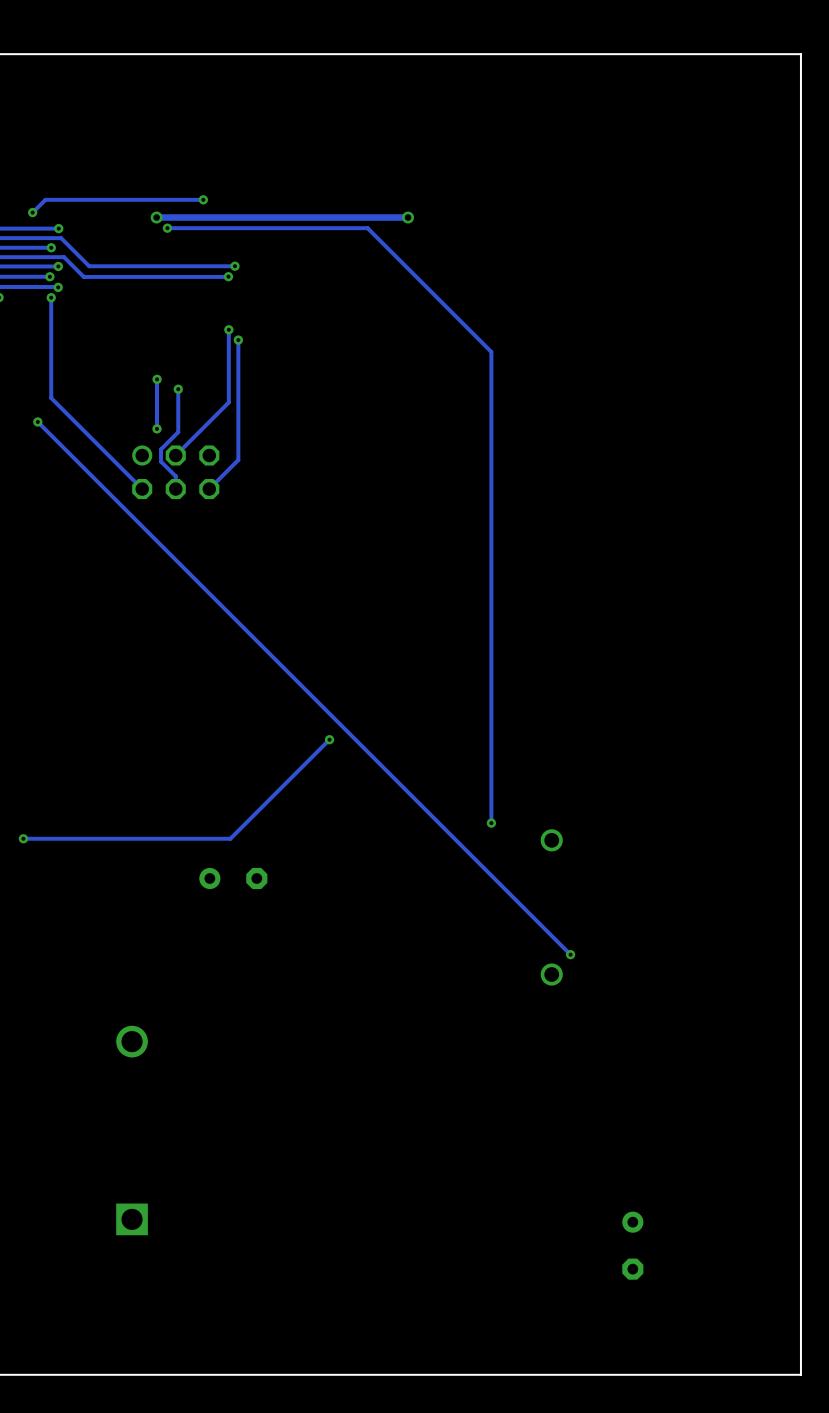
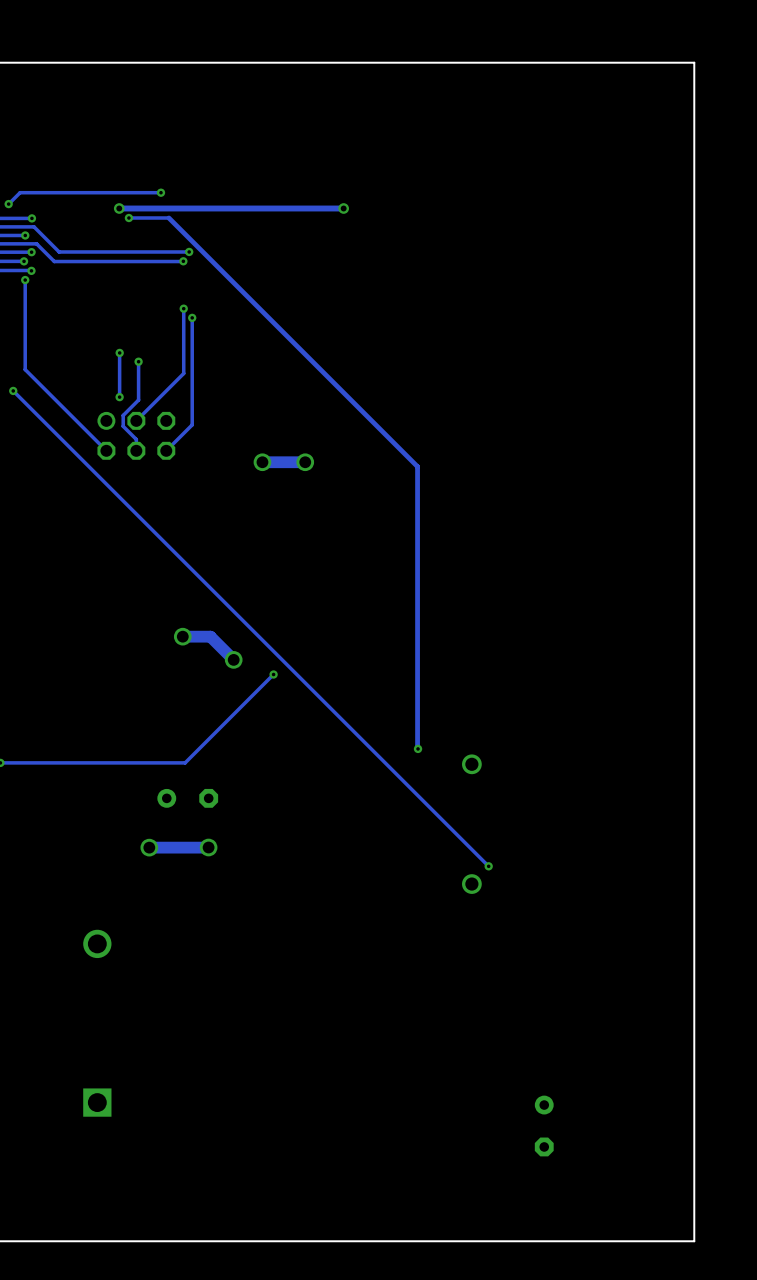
track: (212, 228) (367, 228) (491, 351) (491, 823) -> (168, 218) (417, 466) (418, 748)
via: none -> (262, 462)
track: none -> (301, 462) (262, 462)
via: none -> (305, 462)
track: none -> (182, 636) (210, 636) (233, 659)
via: none -> (182, 636)
via: none -> (233, 659)
via: none -> (149, 847)
track: none -> (208, 847) (149, 847)
via: none -> (208, 847)

